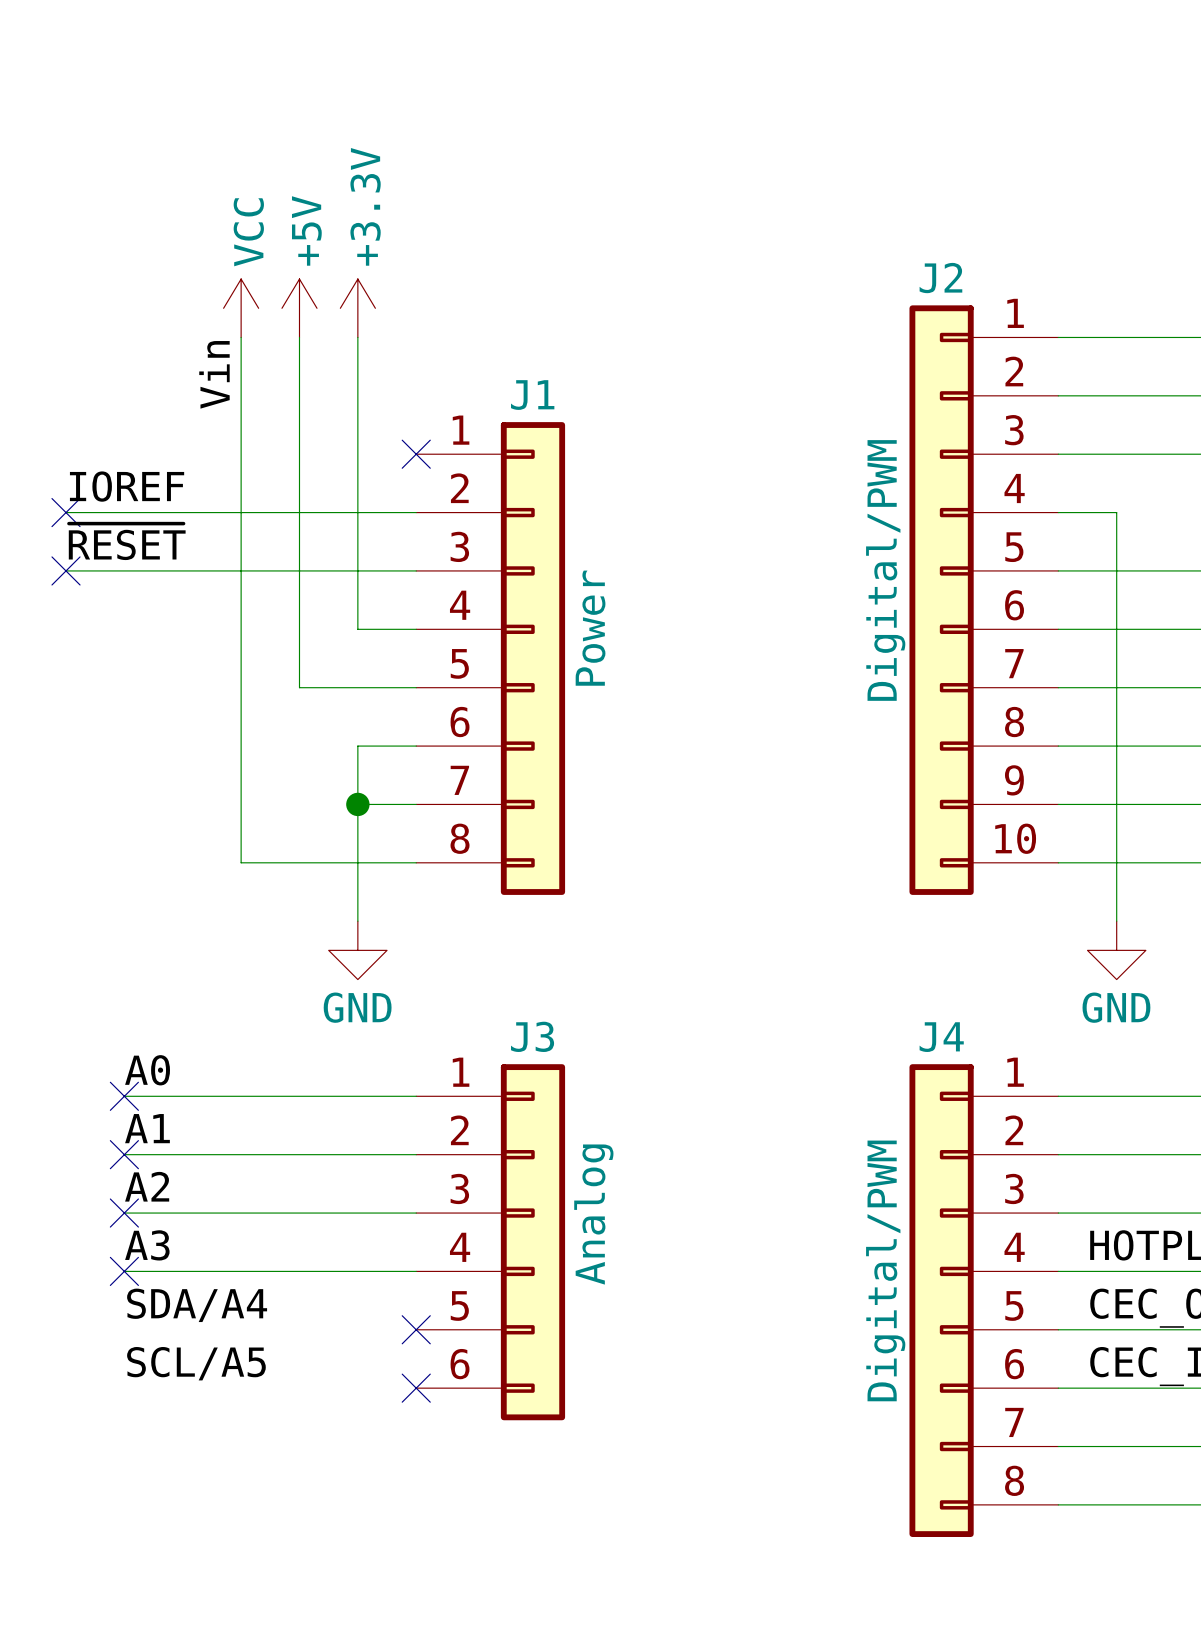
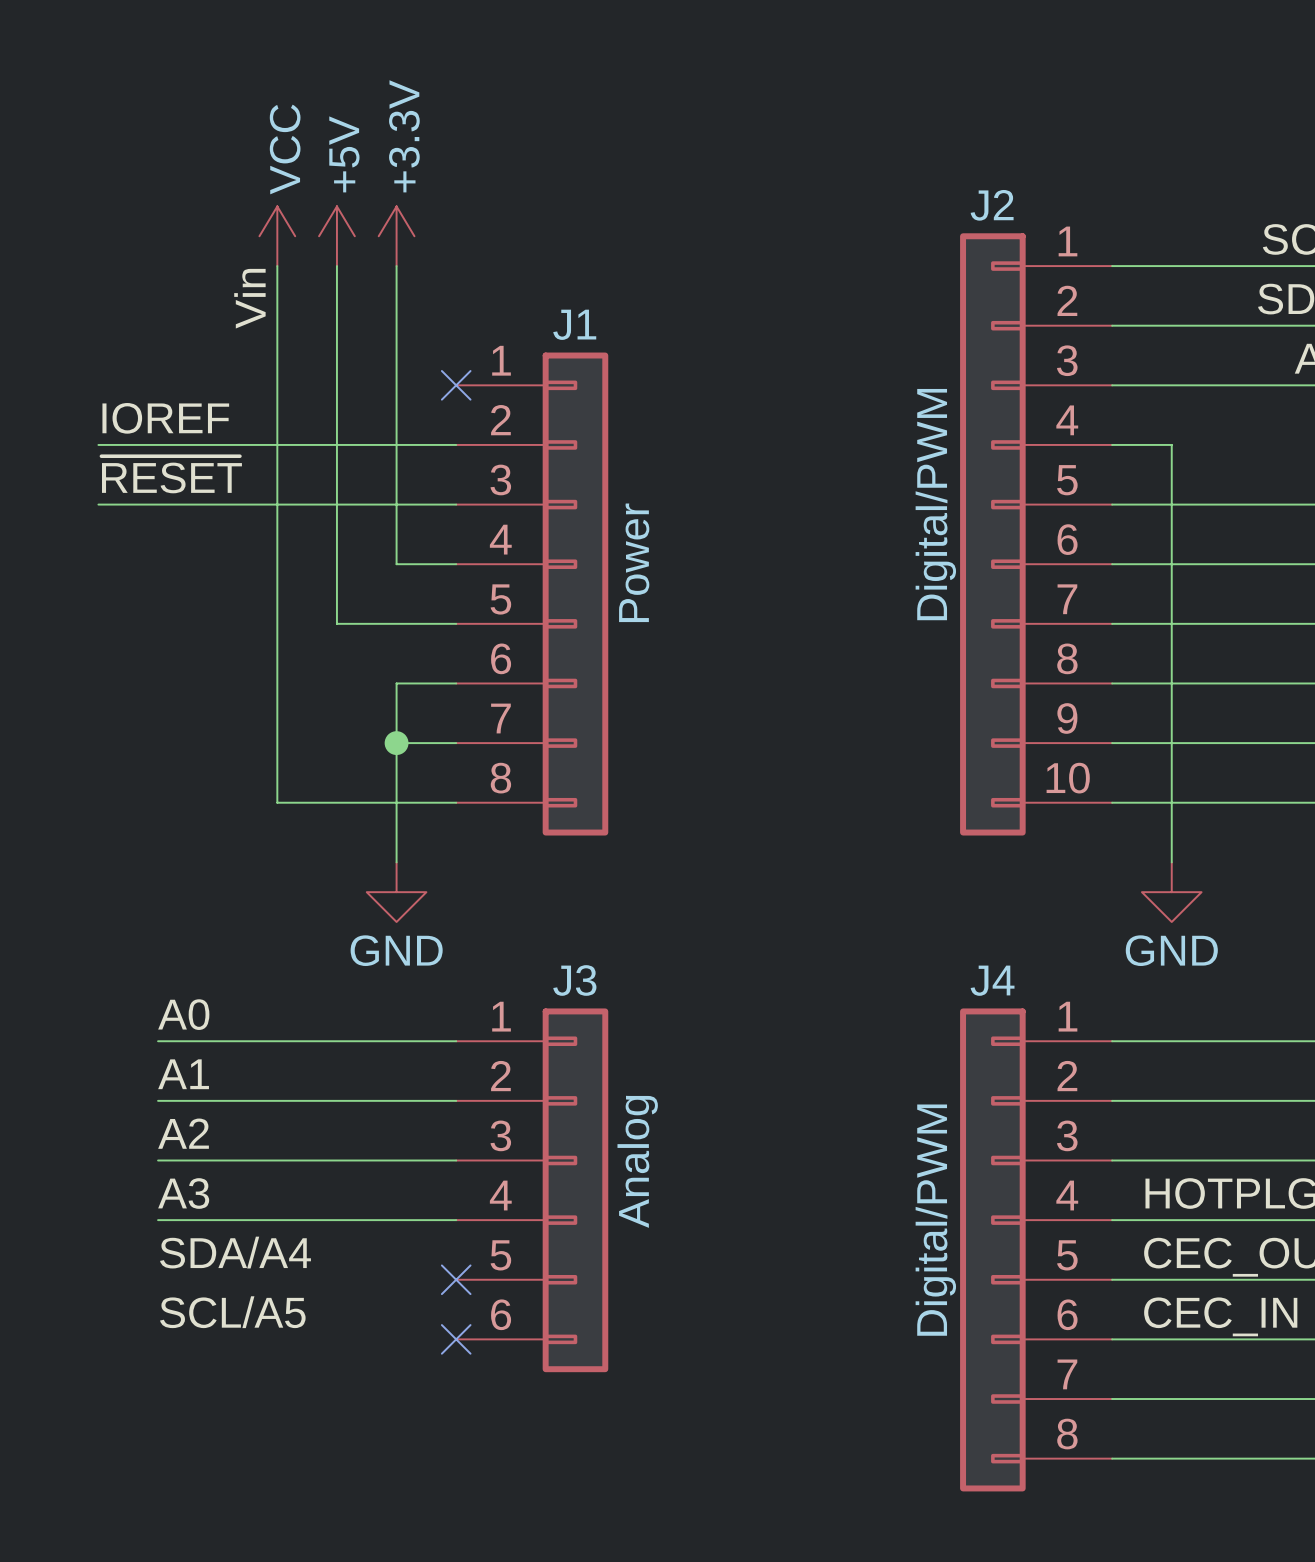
no-connect mark: (66, 512) -> none
no-connect mark: (66, 570) -> none
no-connect mark: (124, 1096) -> none
no-connect mark: (124, 1154) -> none
no-connect mark: (124, 1213) -> none
no-connect mark: (124, 1271) -> none

